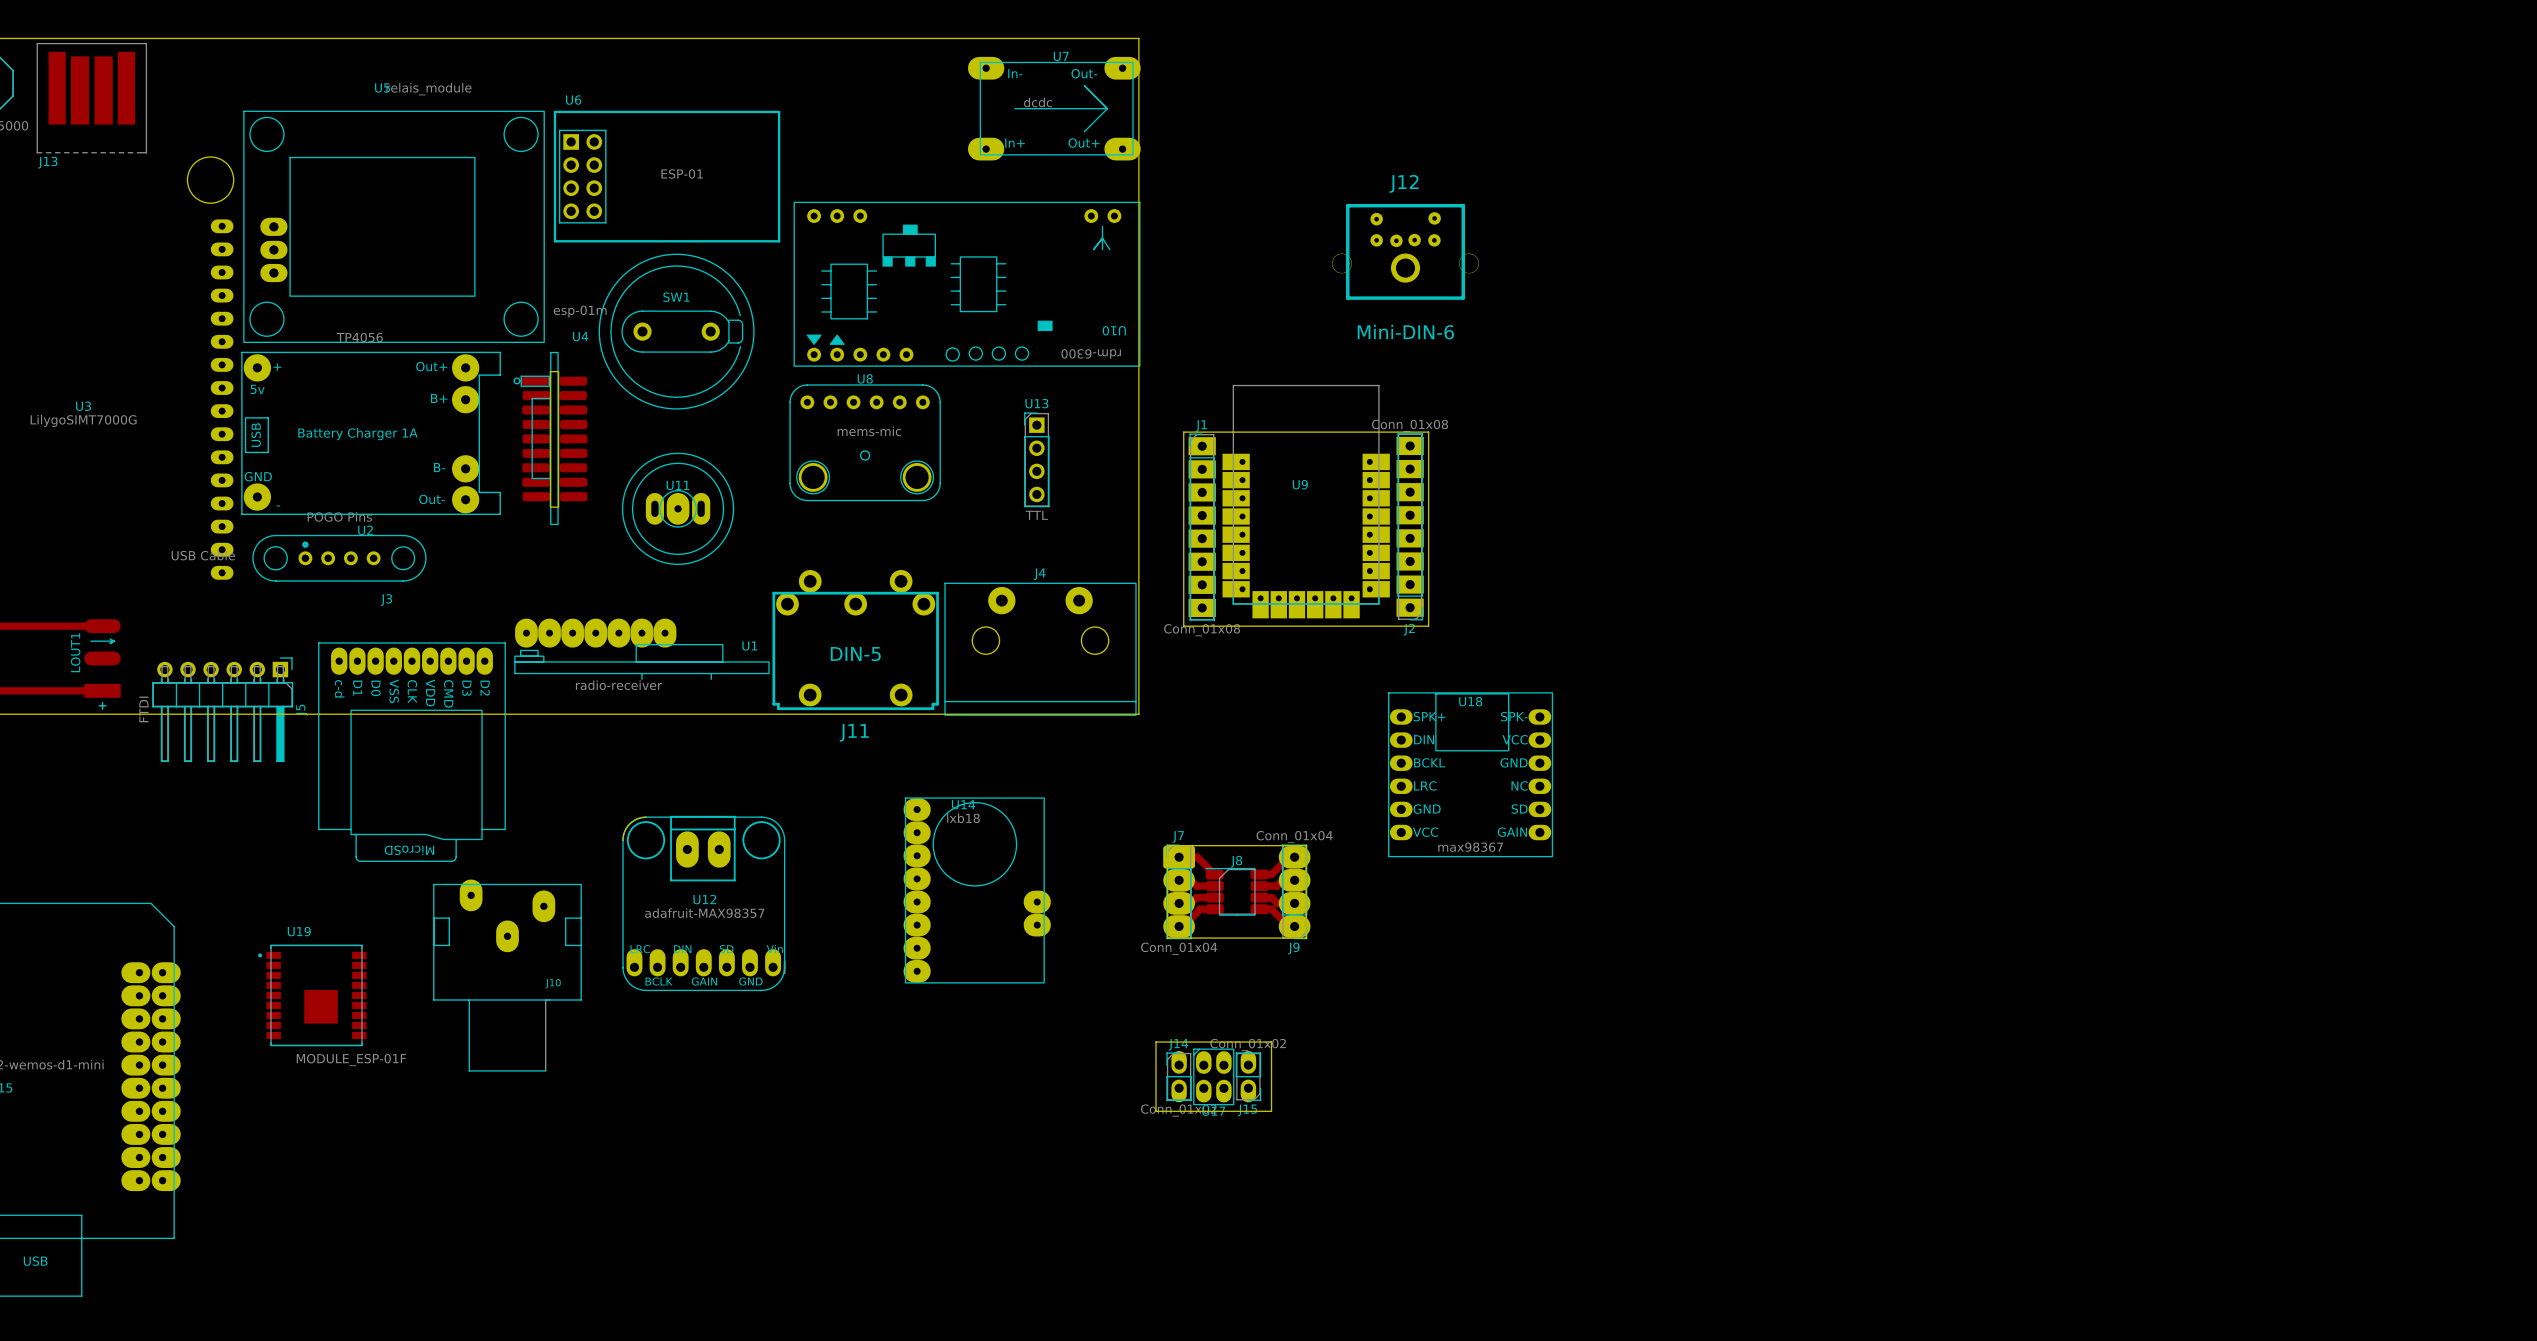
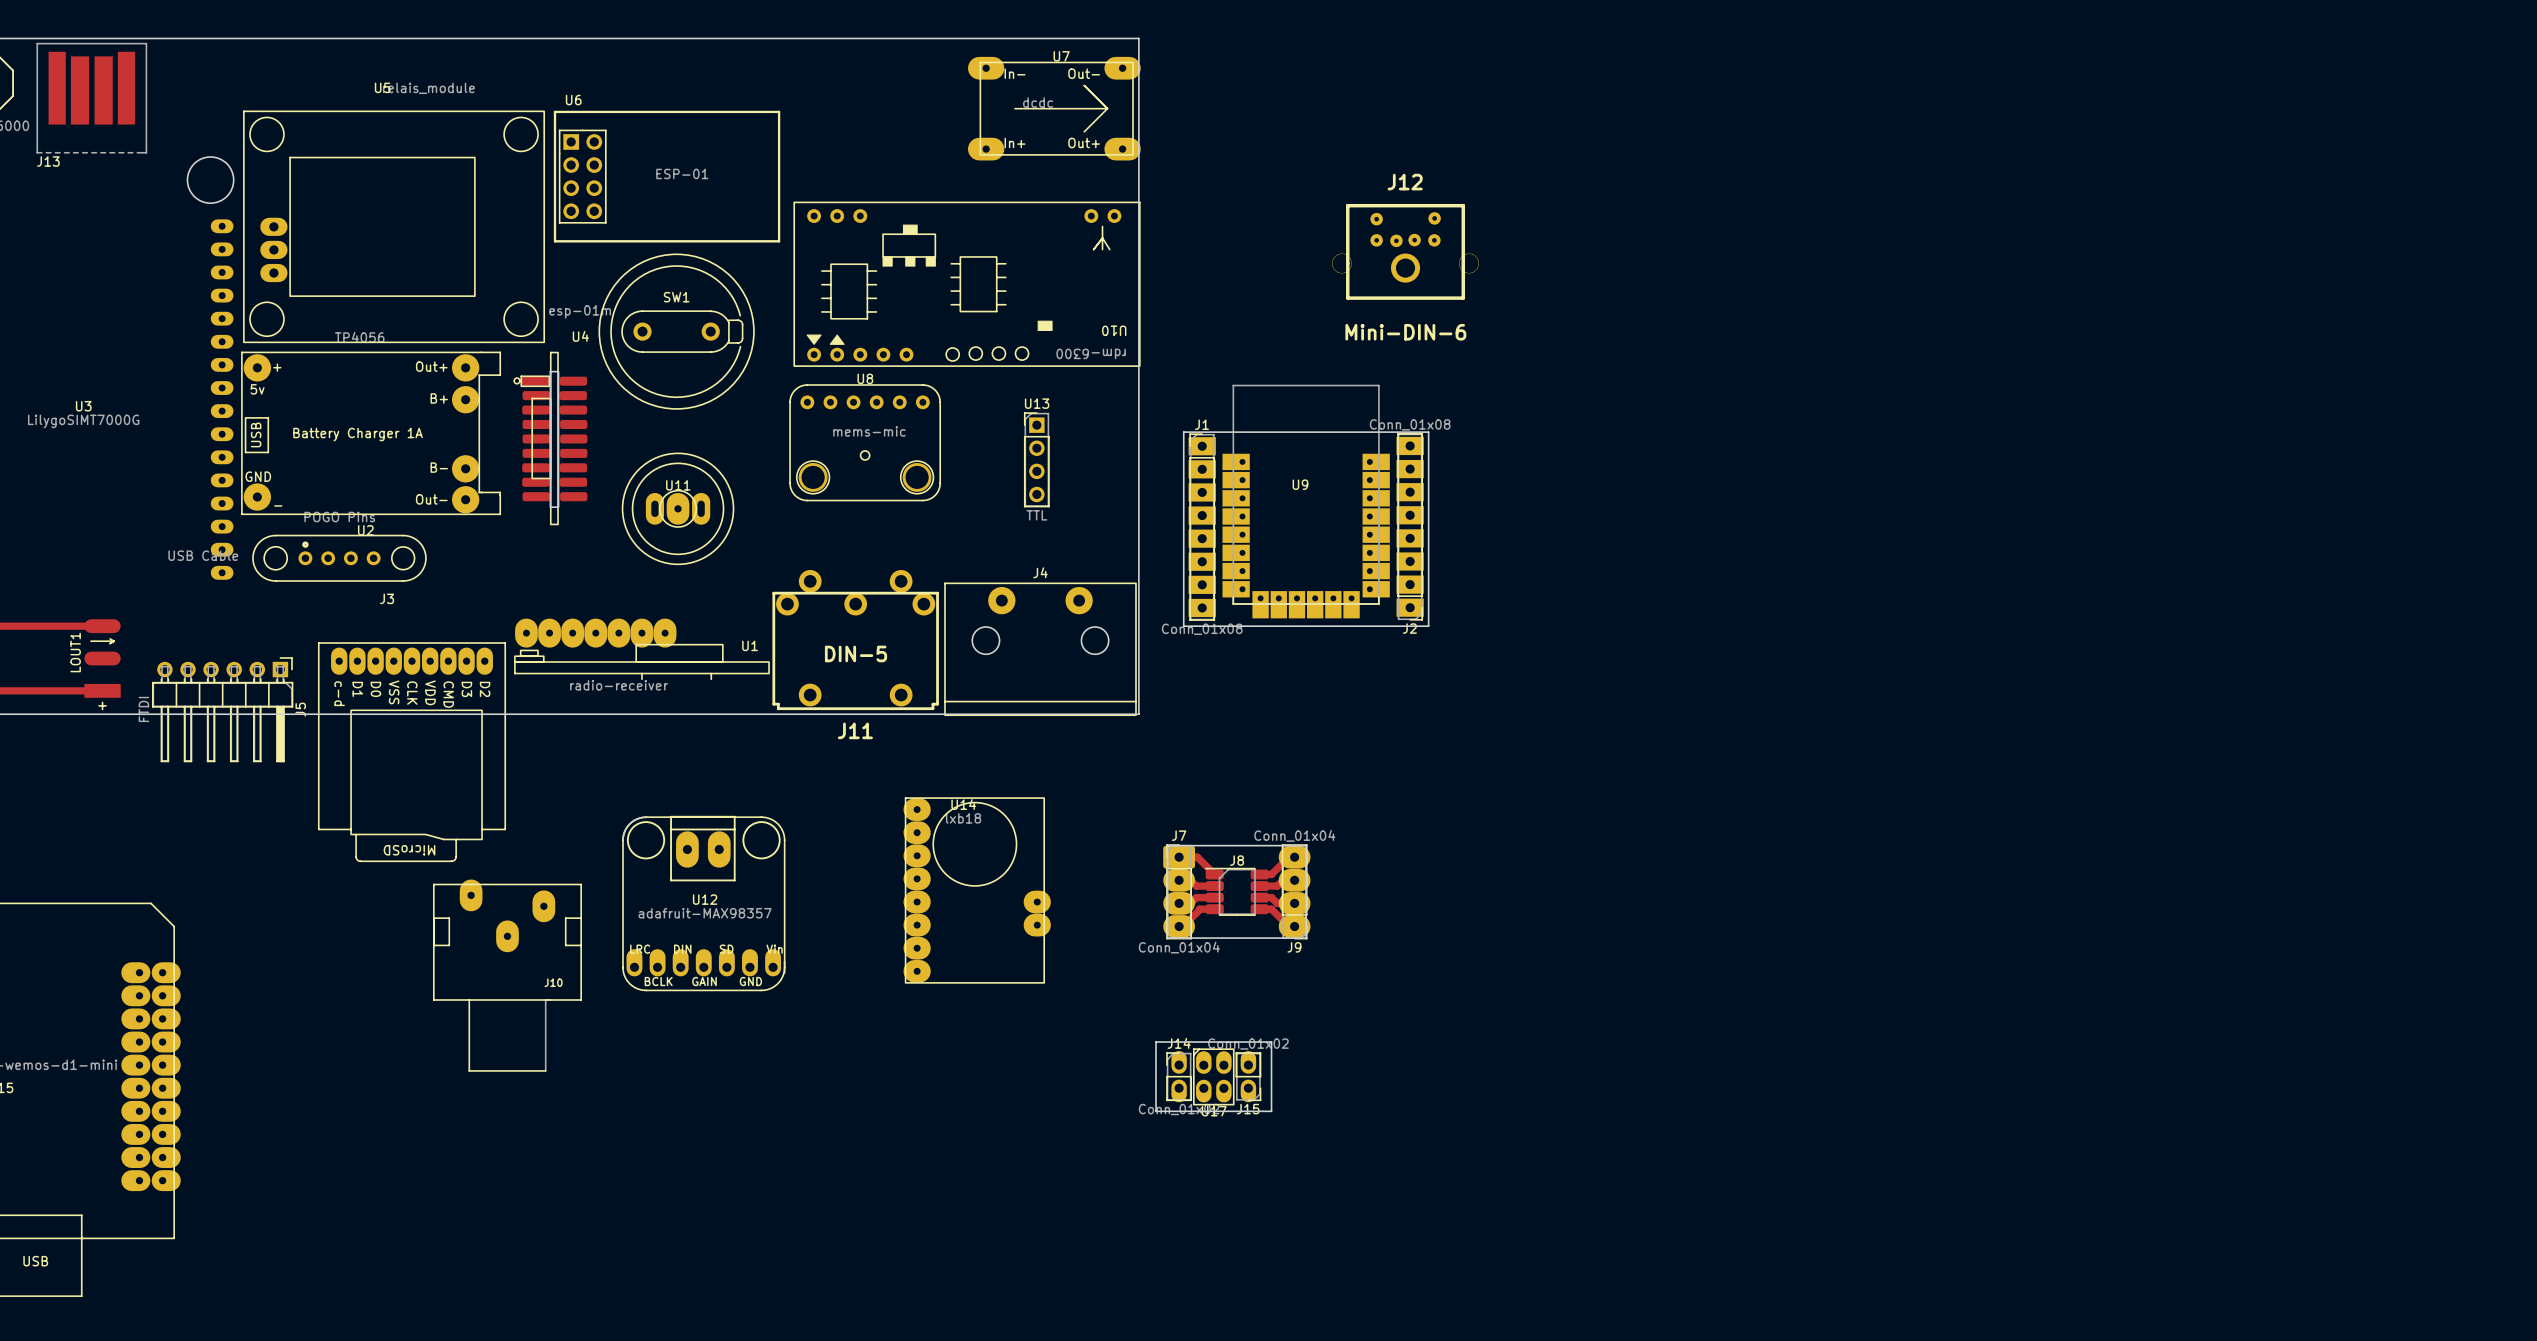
U18: max98367 (1470, 774) -> none
U19: MODULE_ESP-01F (312, 995) -> none

